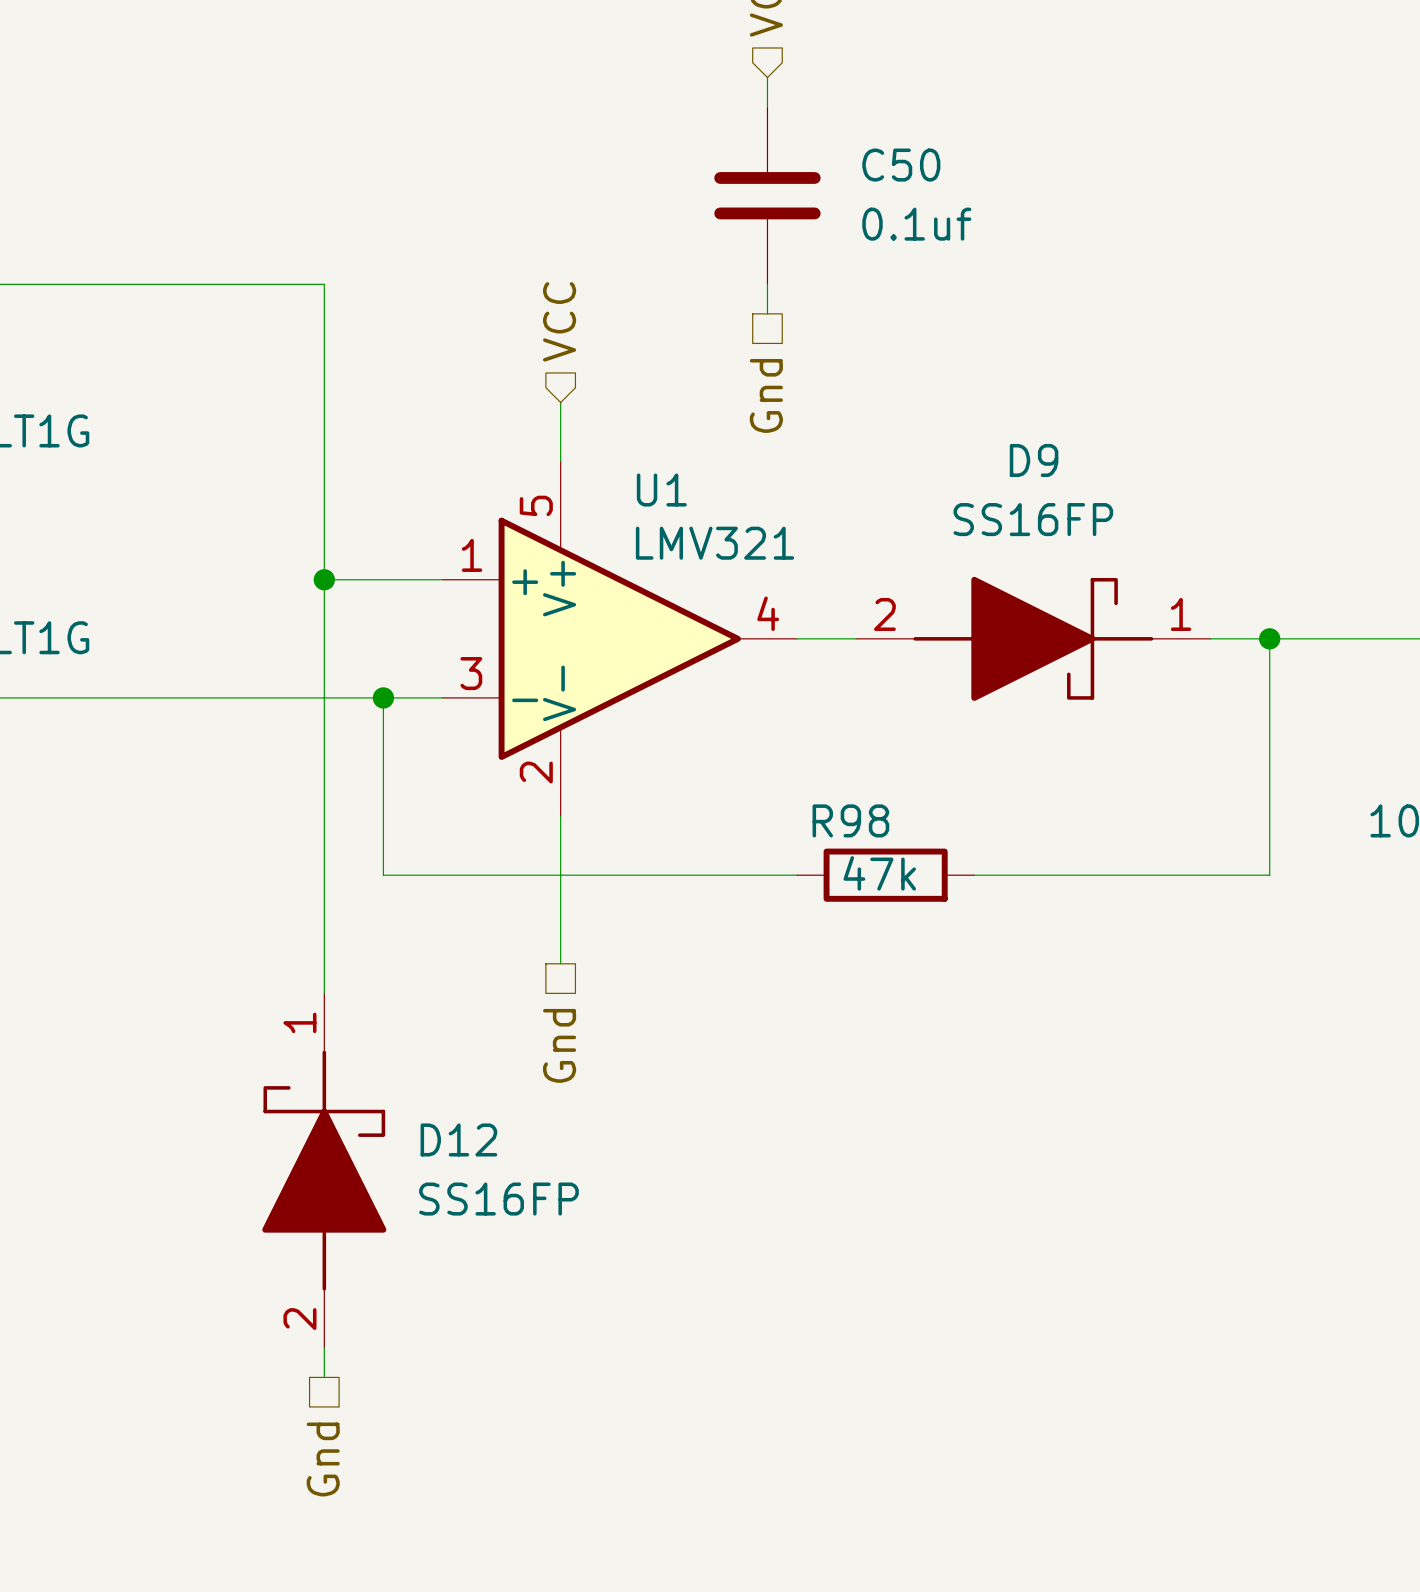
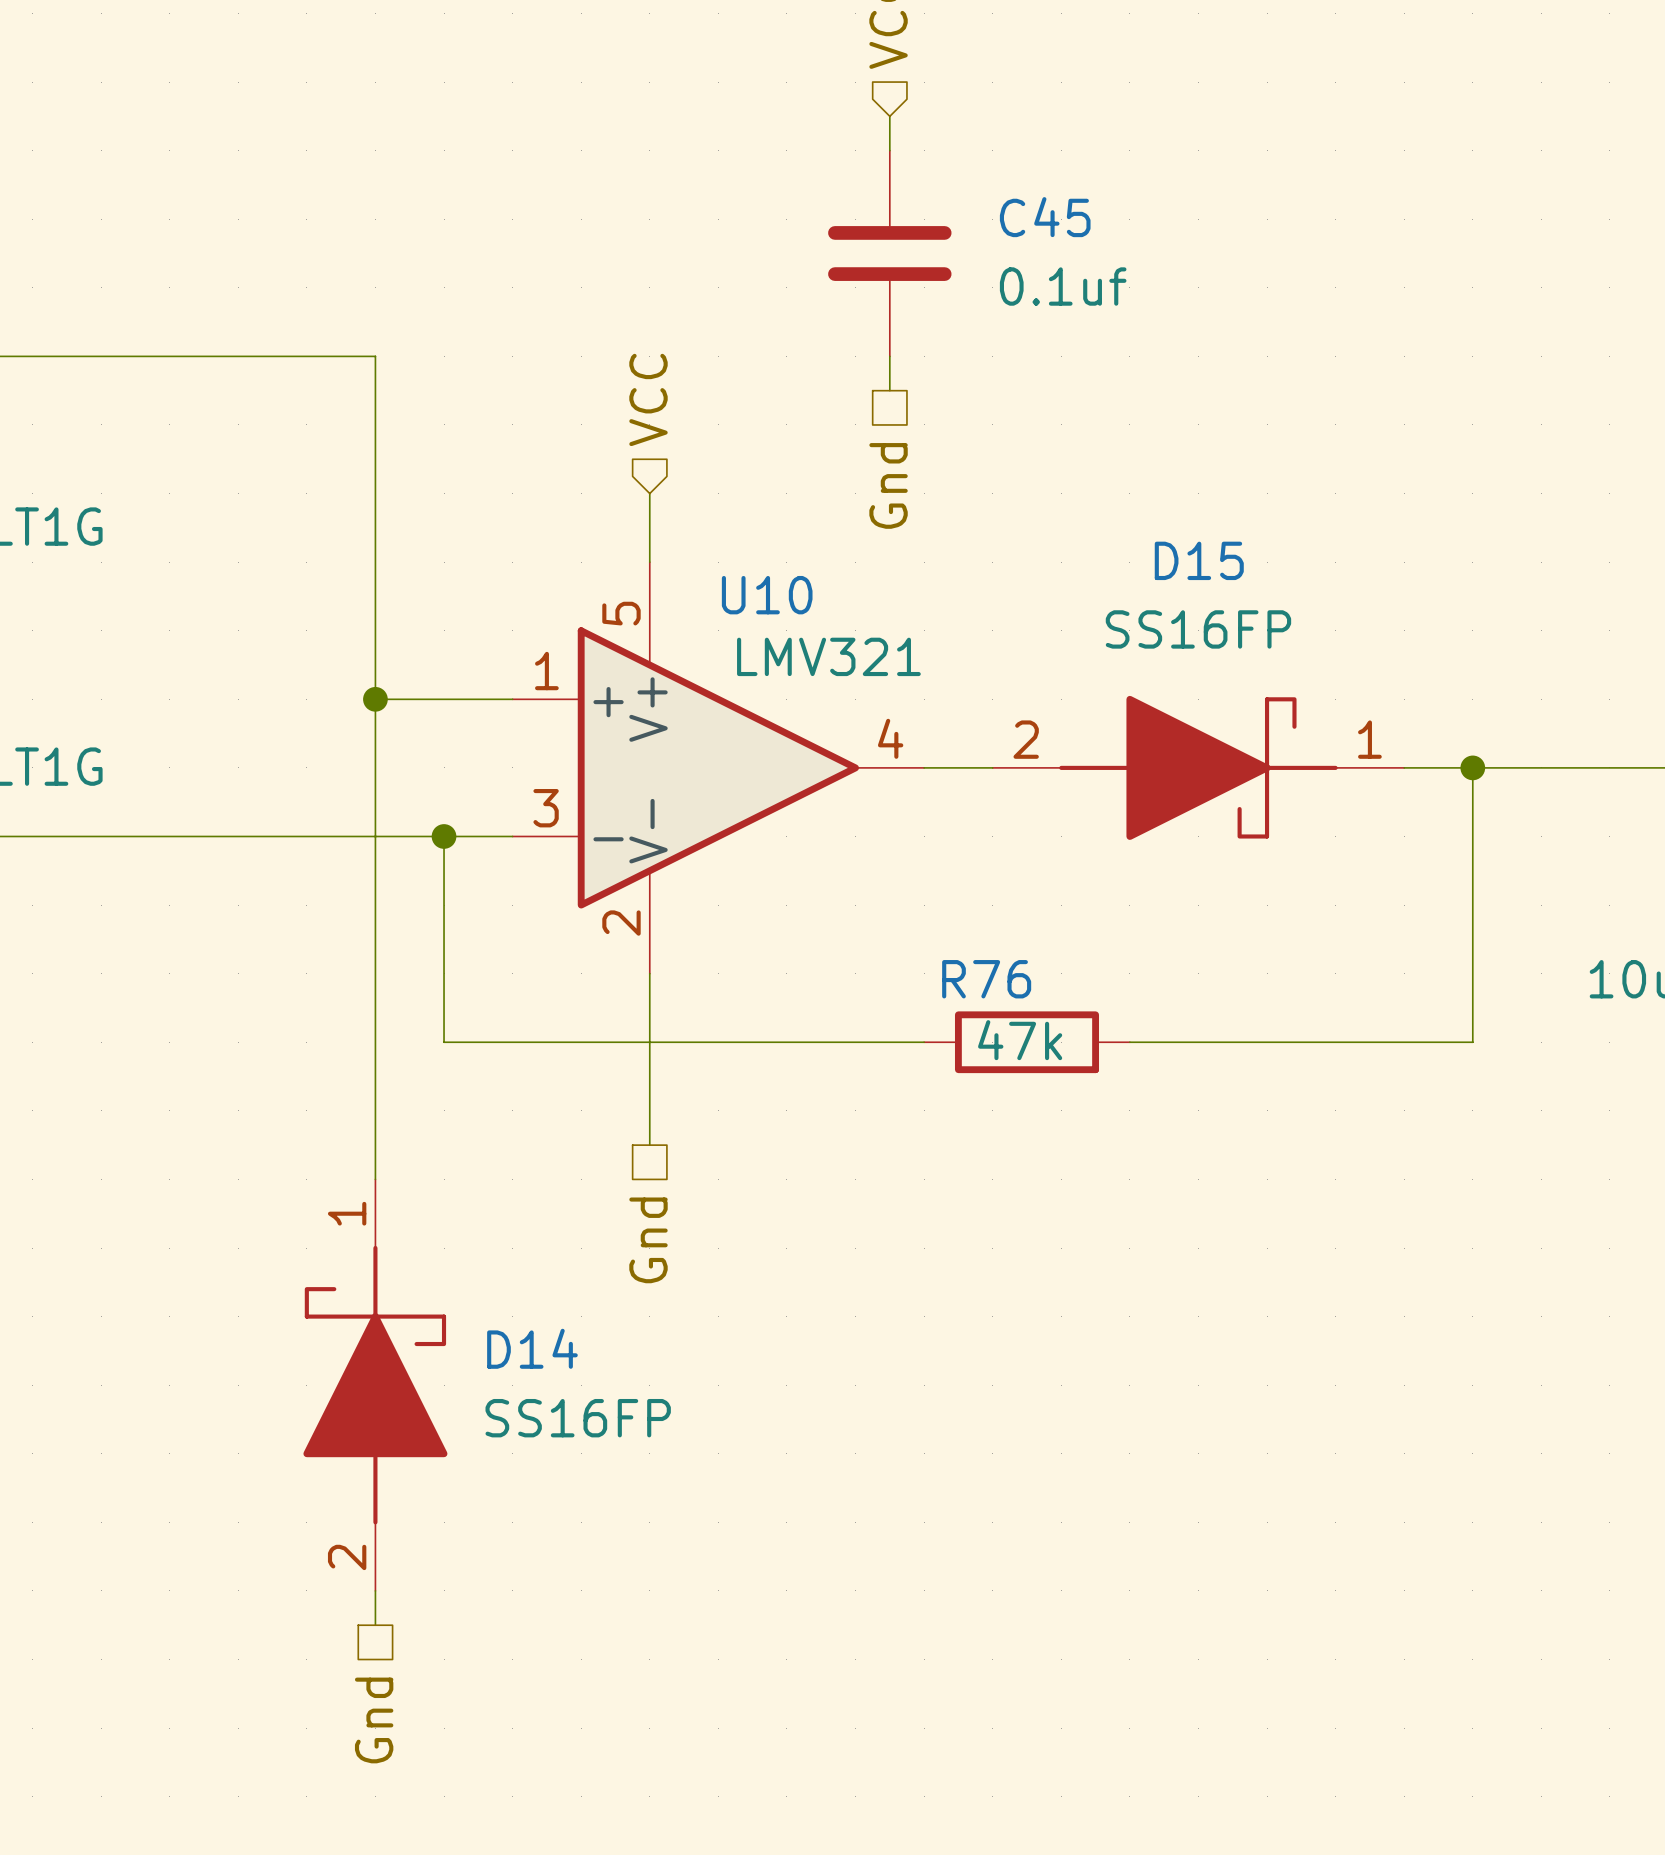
C50 name: C50 (901, 165) -> C45 (1045, 217)
D9 name: D9 (1034, 460) -> D15 (1199, 560)
U1 name: U1 (661, 490) -> U10 (767, 595)
R98 name: R98 (850, 820) -> R76 (986, 979)
D12 name: D12 (458, 1139) -> D14 (532, 1348)

